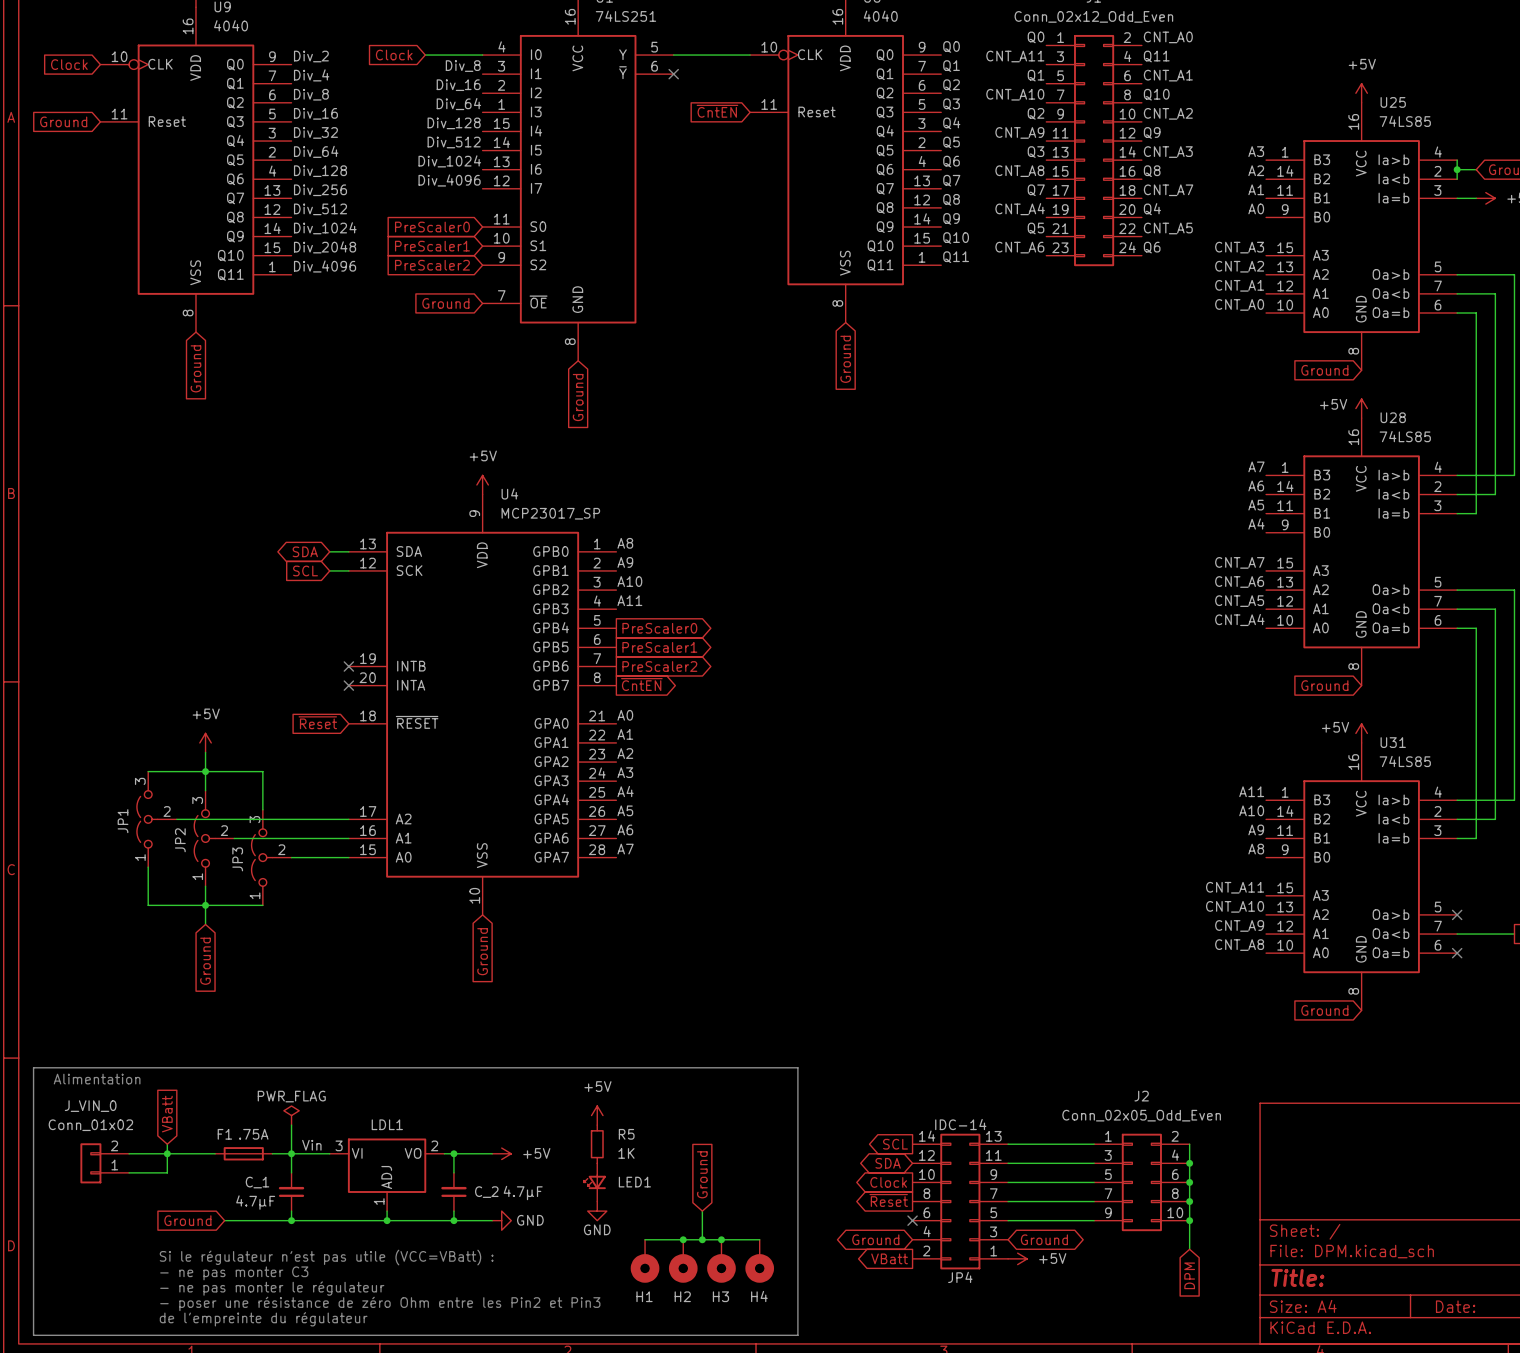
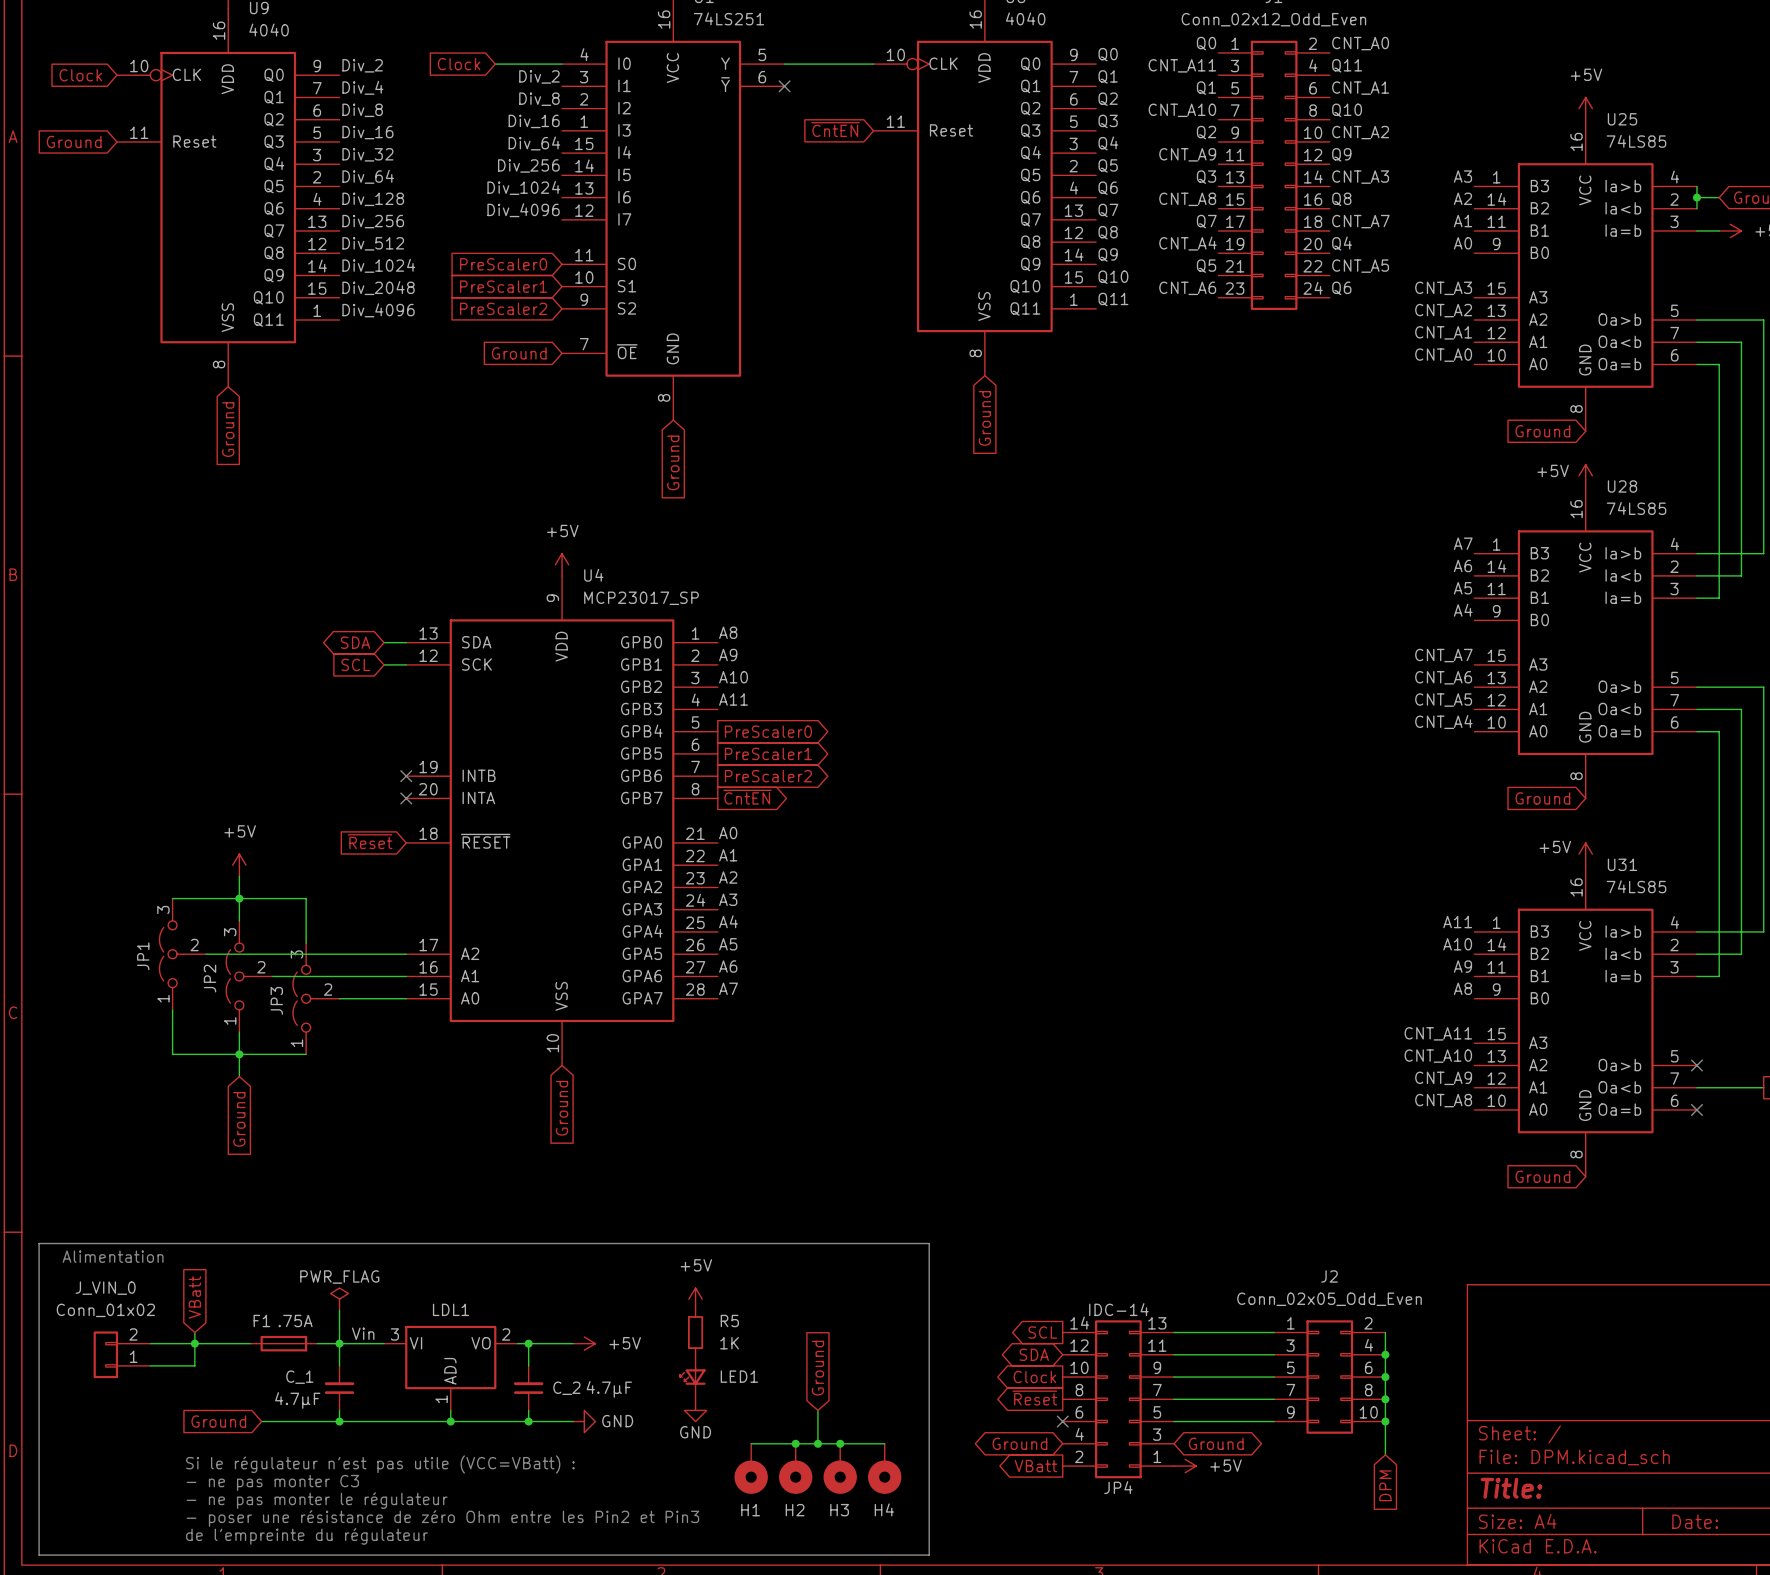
label: Div_8 (463, 66) -> Div_2 (539, 76)
label: Div_16 (458, 85) -> Div_8 (539, 99)
label: Div_64 (458, 104) -> Div_16 (534, 121)
label: Div_128 (454, 123) -> Div_64 (534, 143)
label: Div_512 (454, 142) -> Div_256 (528, 165)

